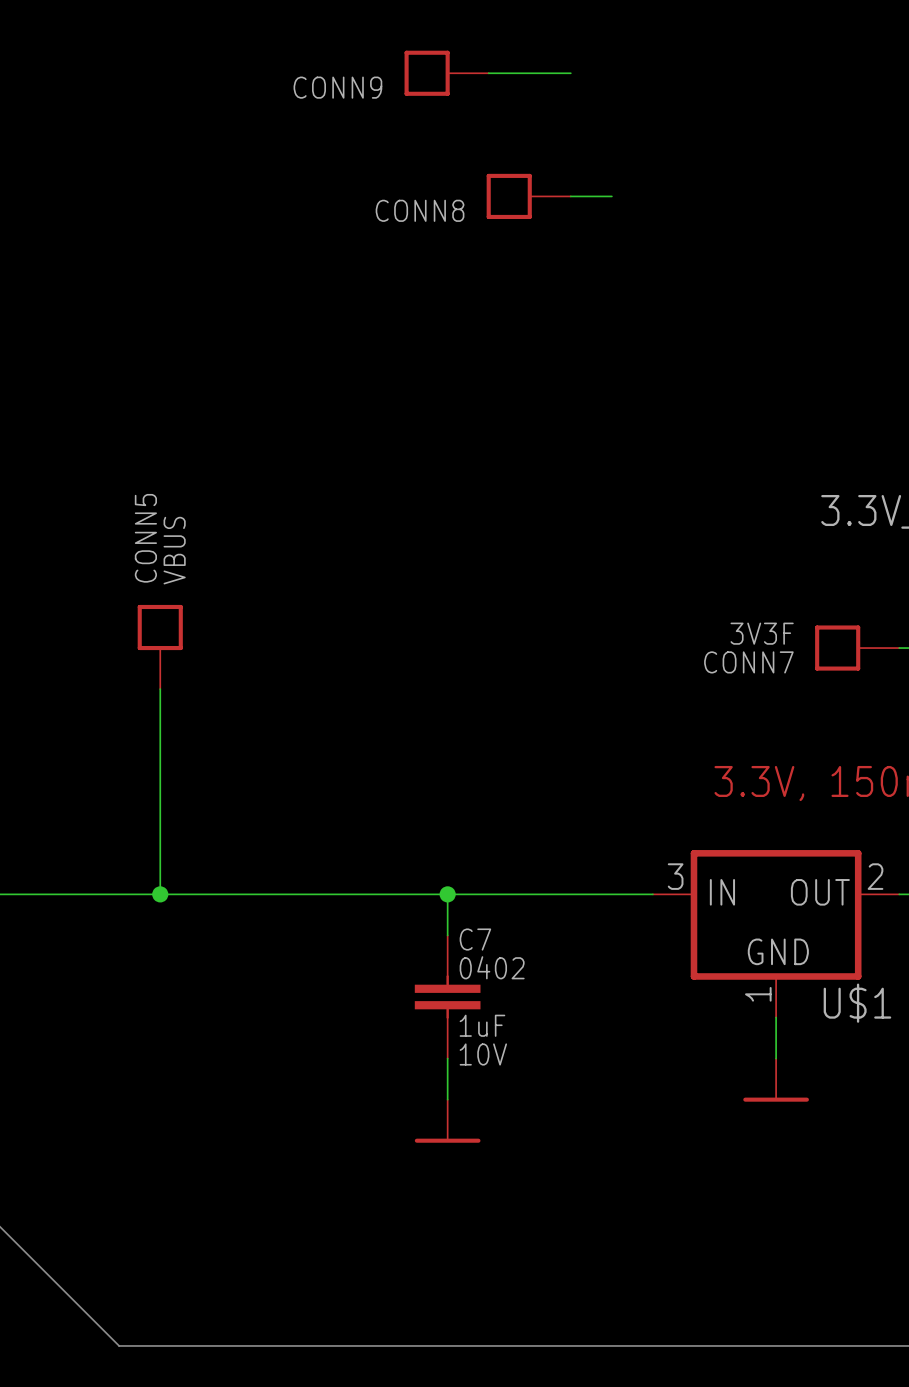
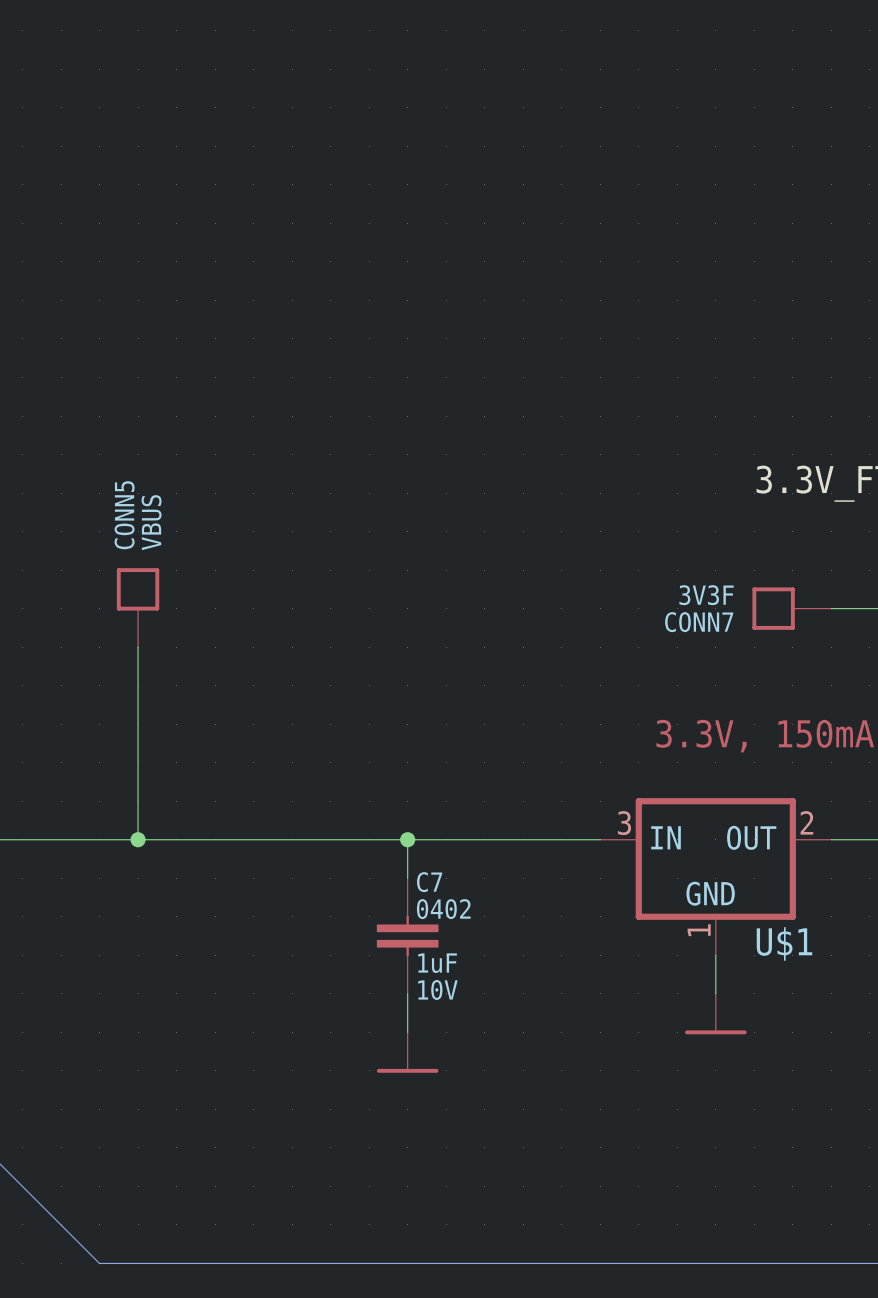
CONN9: (446, 73) -> none
wire: (488, 73) (570, 73) -> none
CONN8: (528, 196) -> none
wire: (570, 196) (611, 196) -> none

